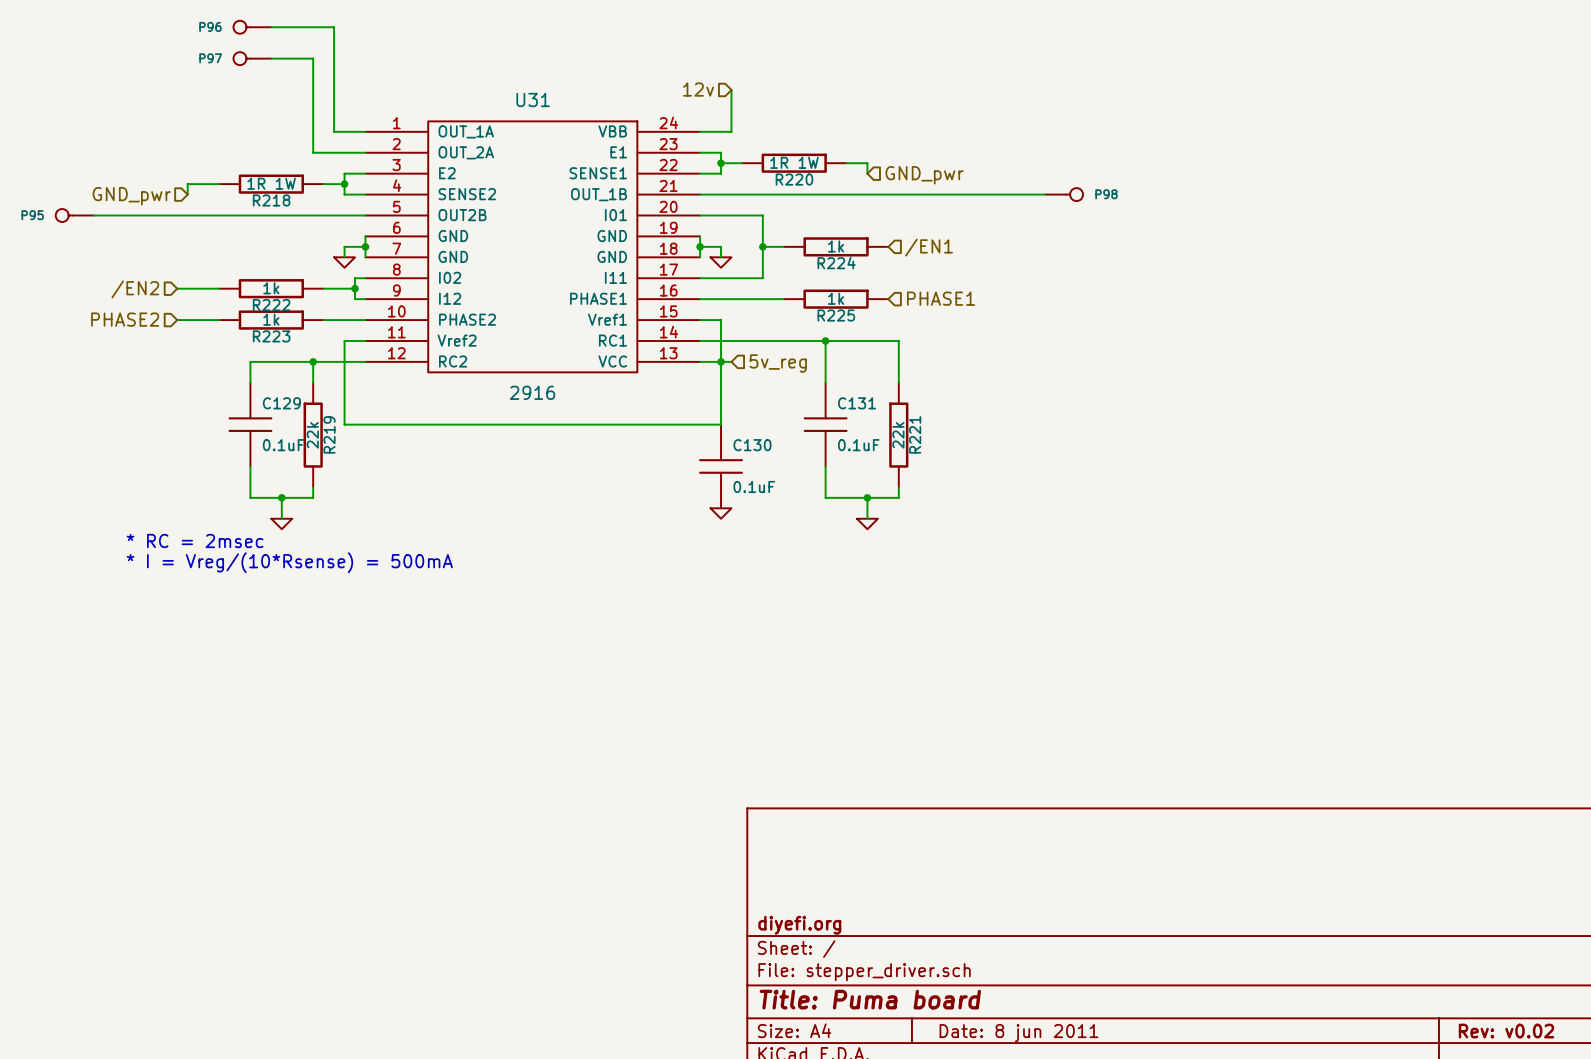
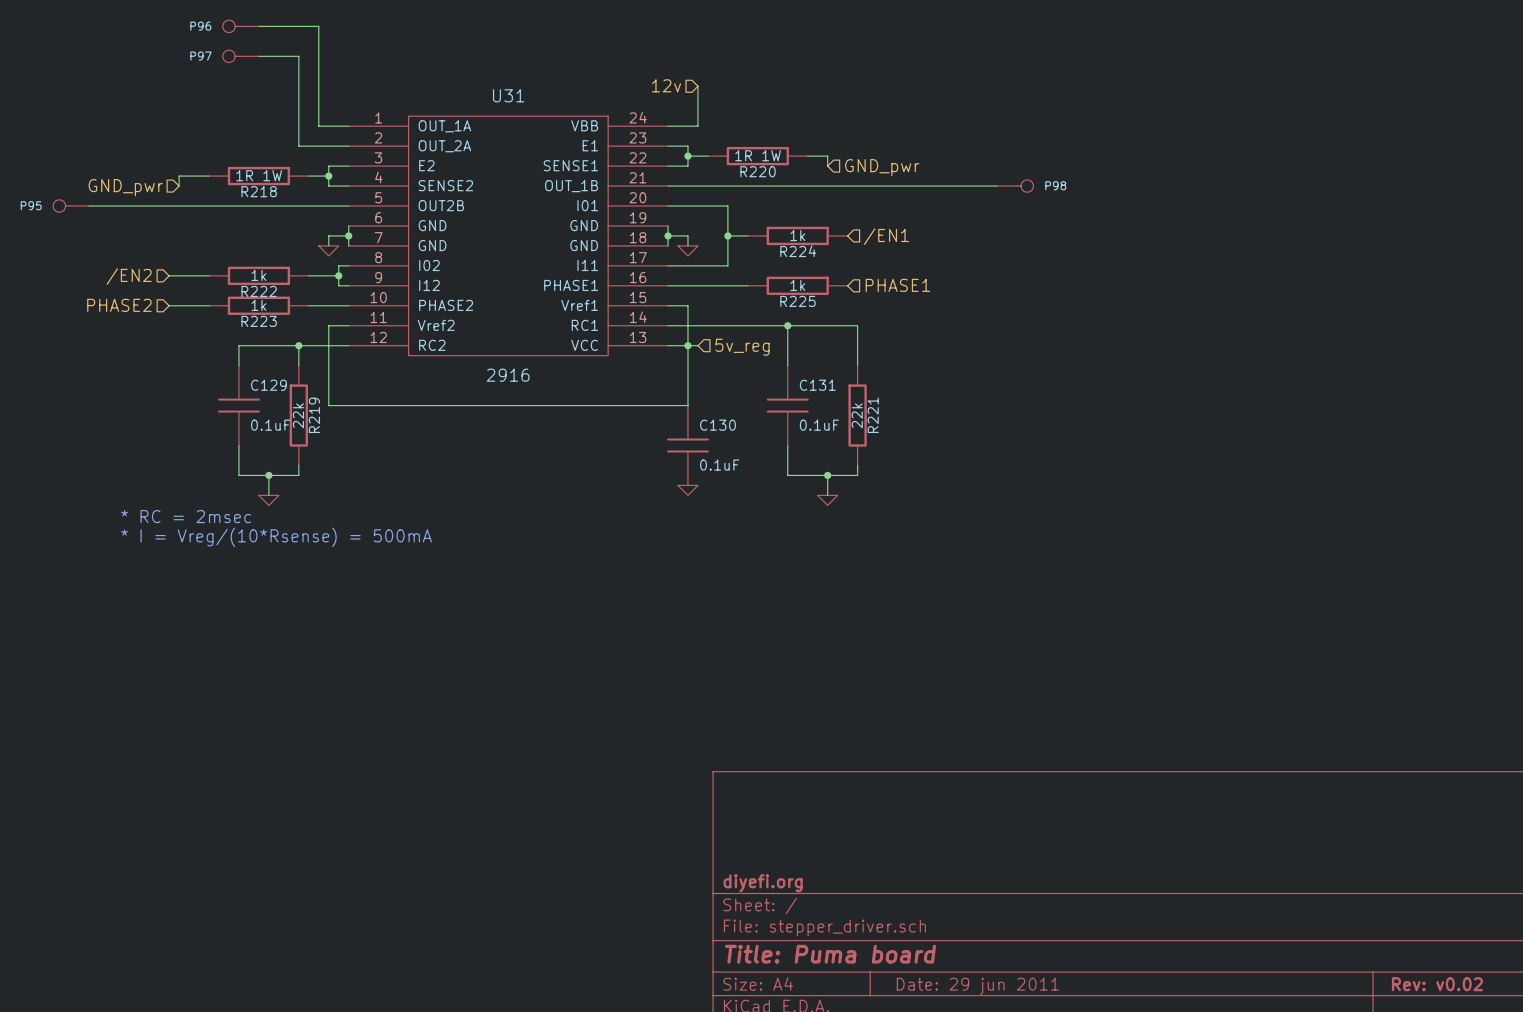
title block: Date: 8 jun 2011 (1018, 1033) -> Date: 29 jun 2011 (977, 986)

